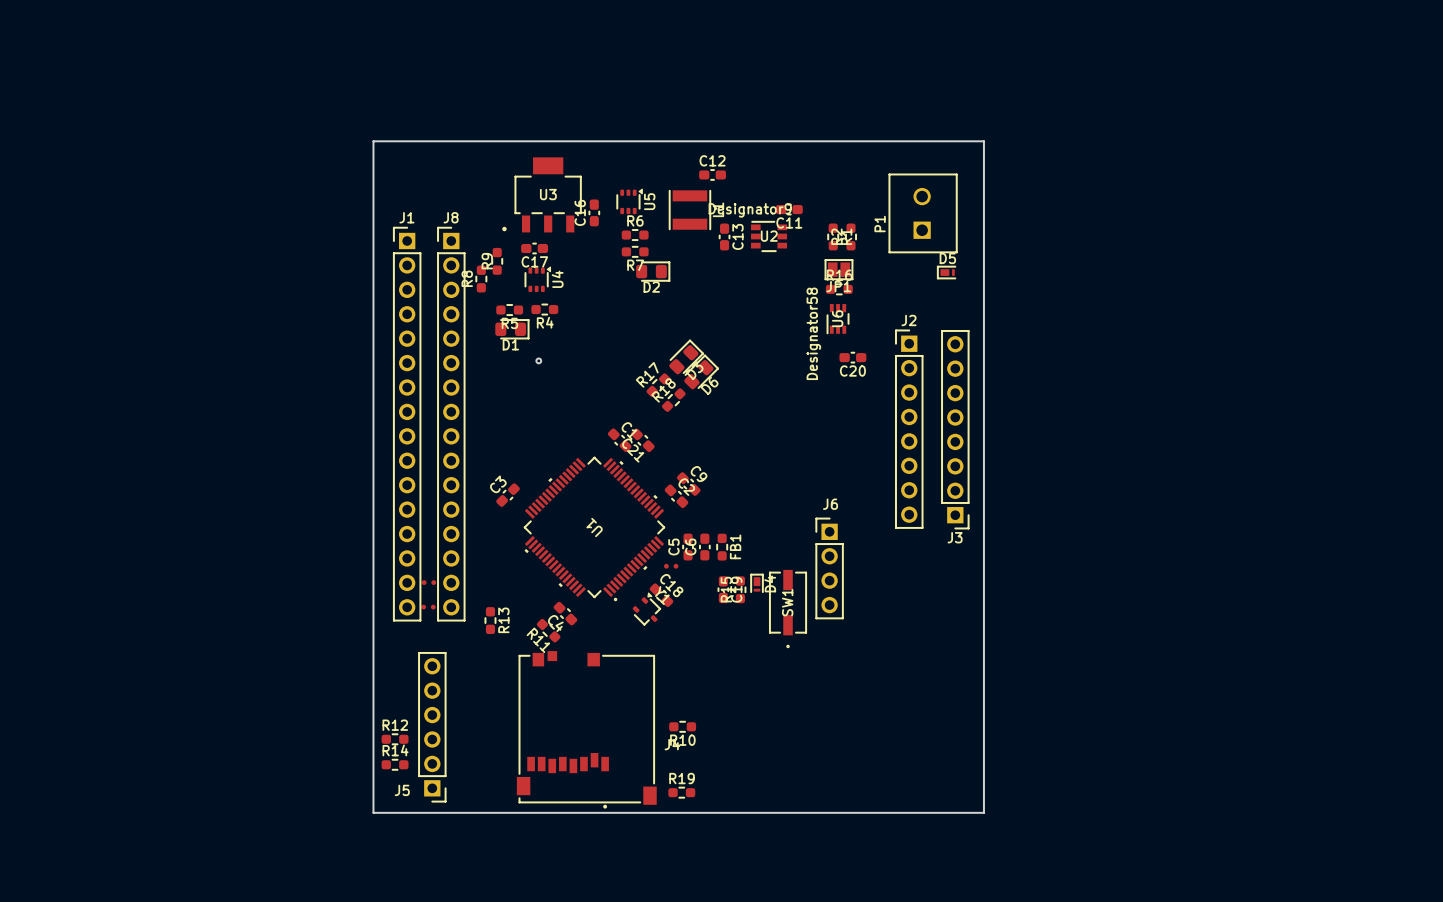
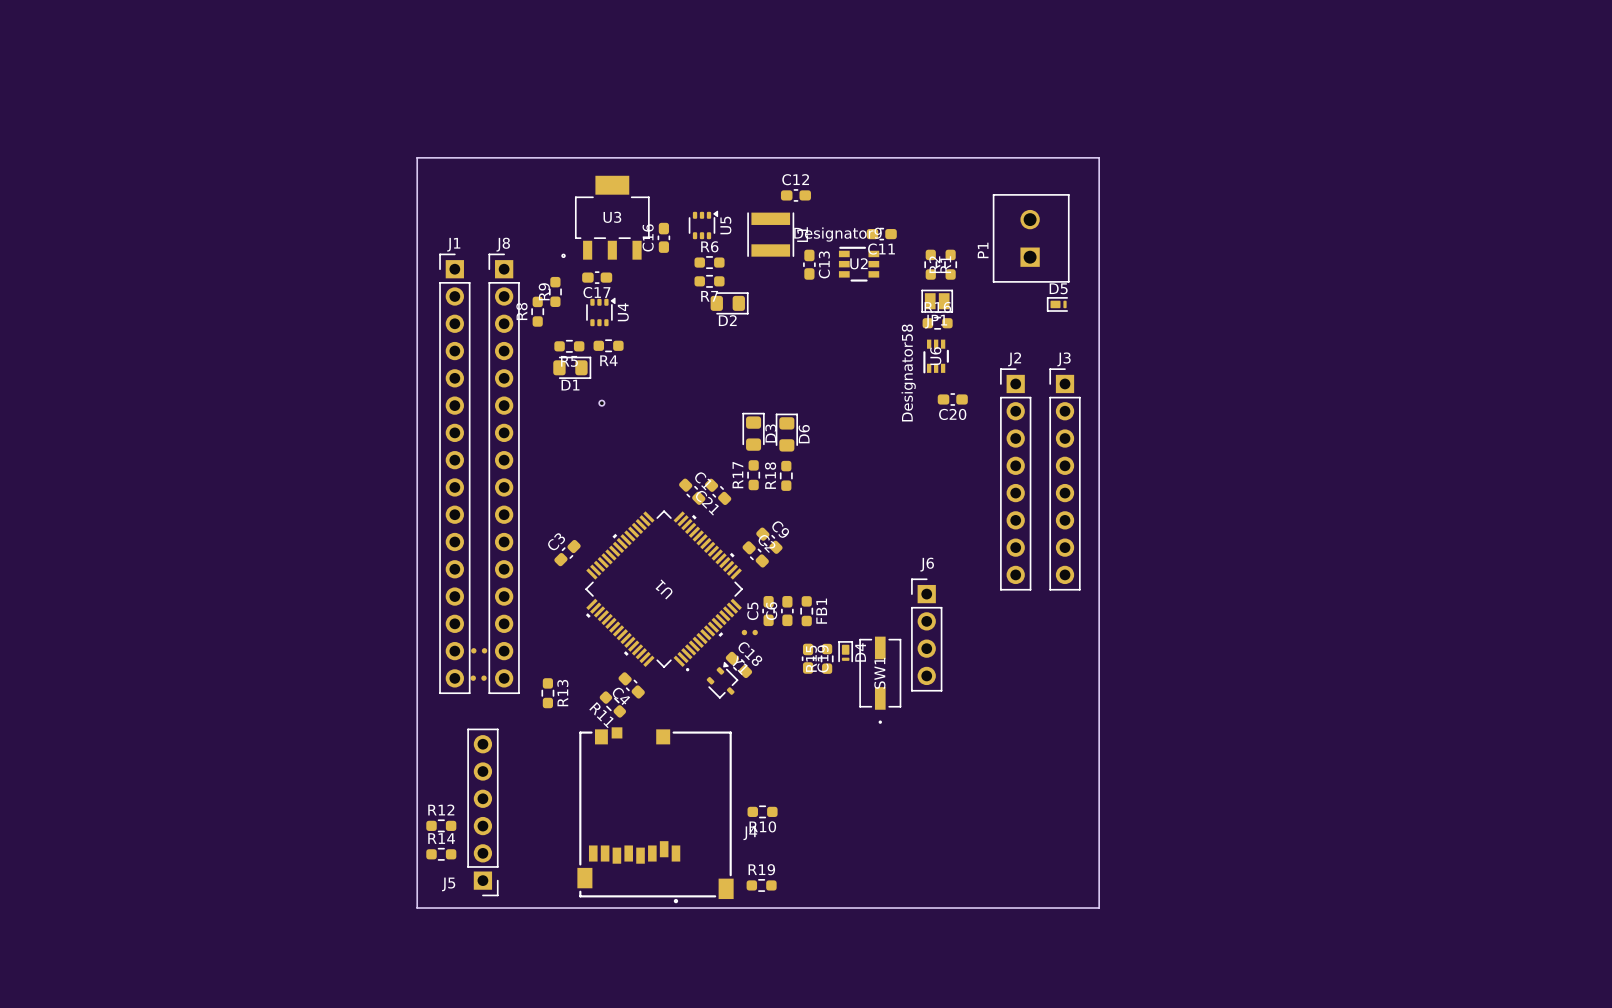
D3 rotation: 0° (686, 357) -> 45° counterclockwise (753, 431)
D3 position: (686, 357) -> (753, 431)
D6 rotation: 0° (701, 372) -> 45° counterclockwise (786, 432)
R17 rotation: 0° (658, 385) -> 45° counterclockwise (753, 475)
R17 position: (658, 385) -> (753, 475)
R18 rotation: 0° (673, 400) -> 45° counterclockwise (786, 475)
R18 position: (673, 400) -> (786, 475)
J3 rotation: 0° (955, 429) -> 180° (1065, 479)

